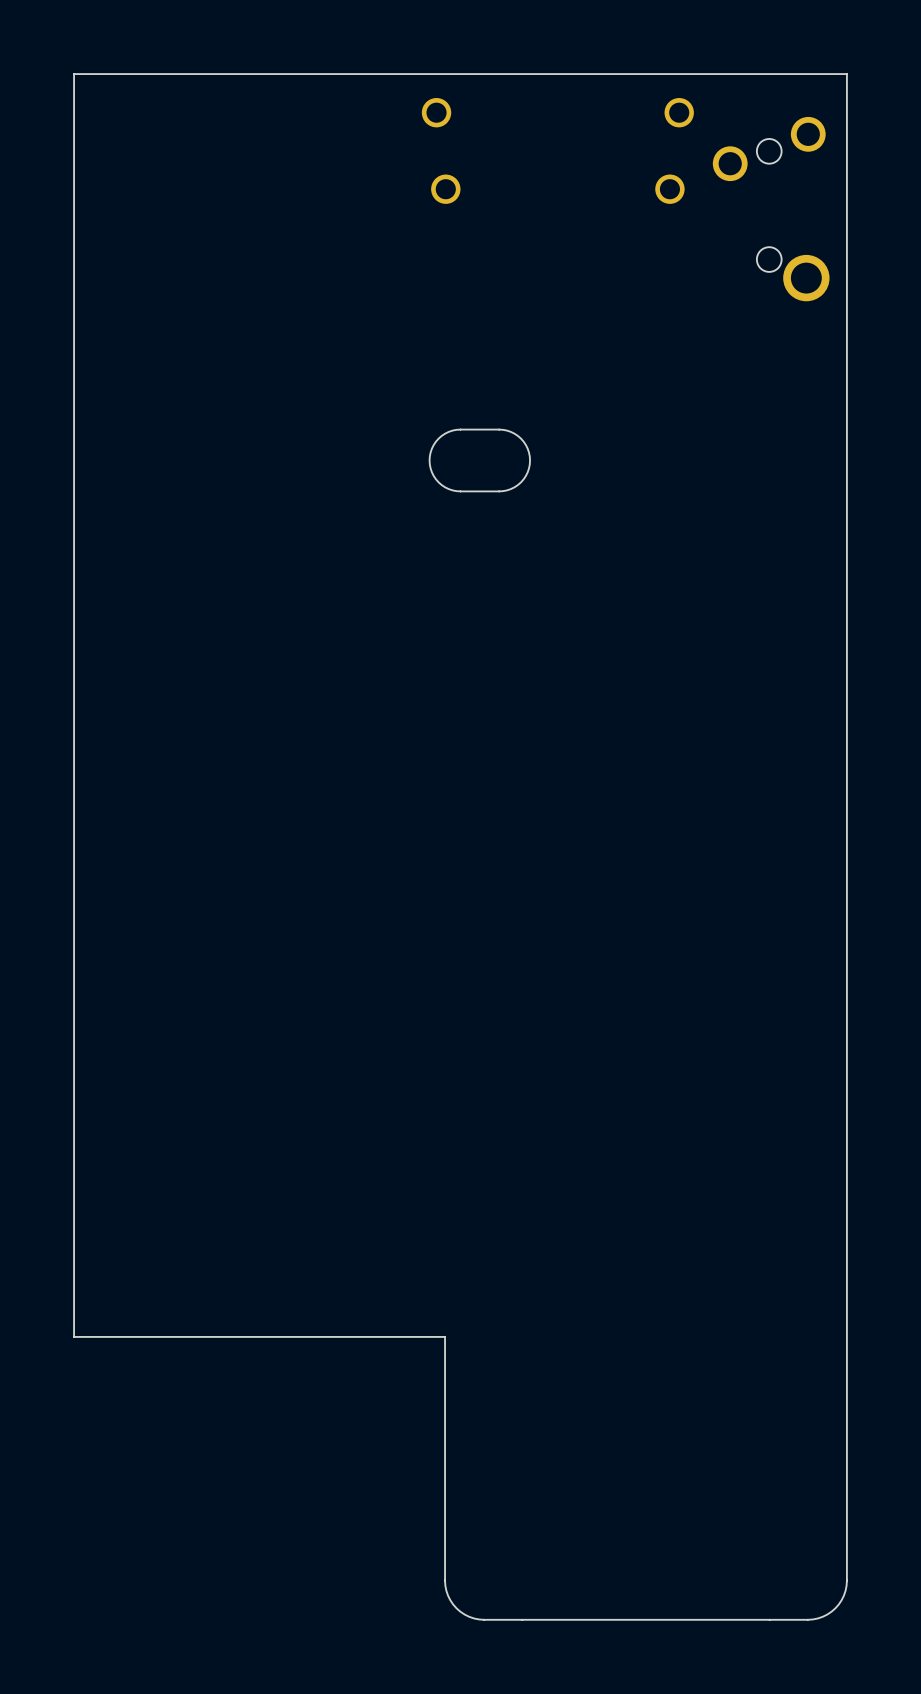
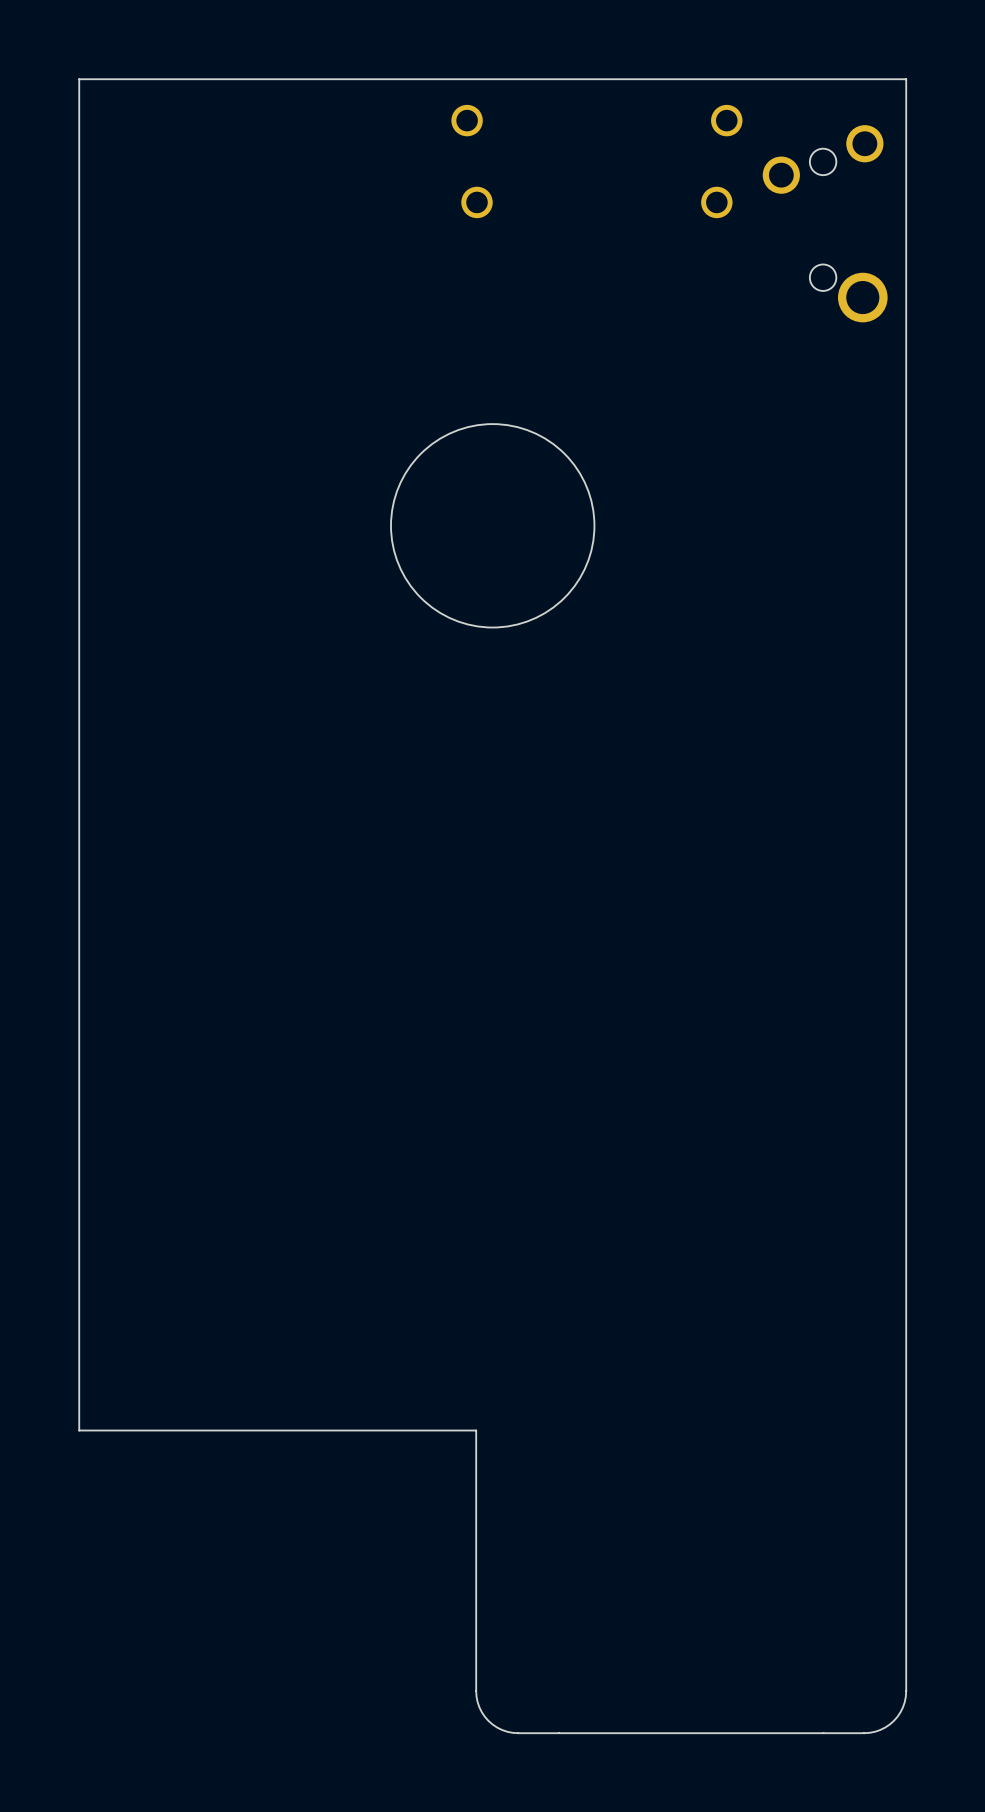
round board edge: none -> [390, 423, 595, 628]
board edge: (499, 429) (456, 429) (441, 435) (433, 445) (429, 456) (430, 468) (435, 479) (445, 487) (456, 491) (503, 491) (517, 485) (525, 475) (529, 468) (530, 460) (527, 448) (517, 435) (507, 430) (499, 429) -> none

